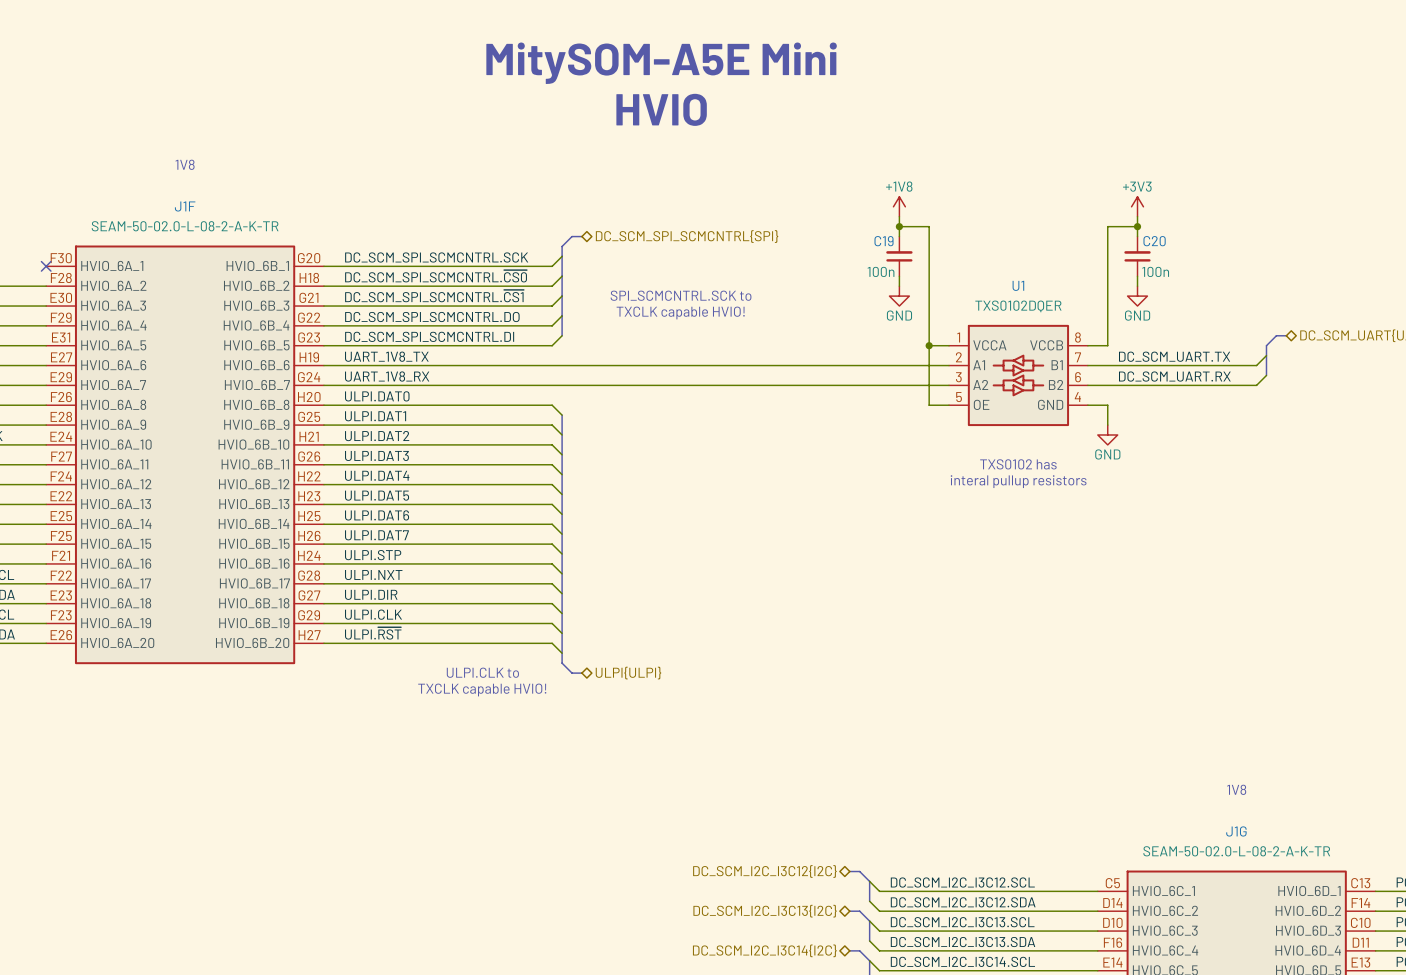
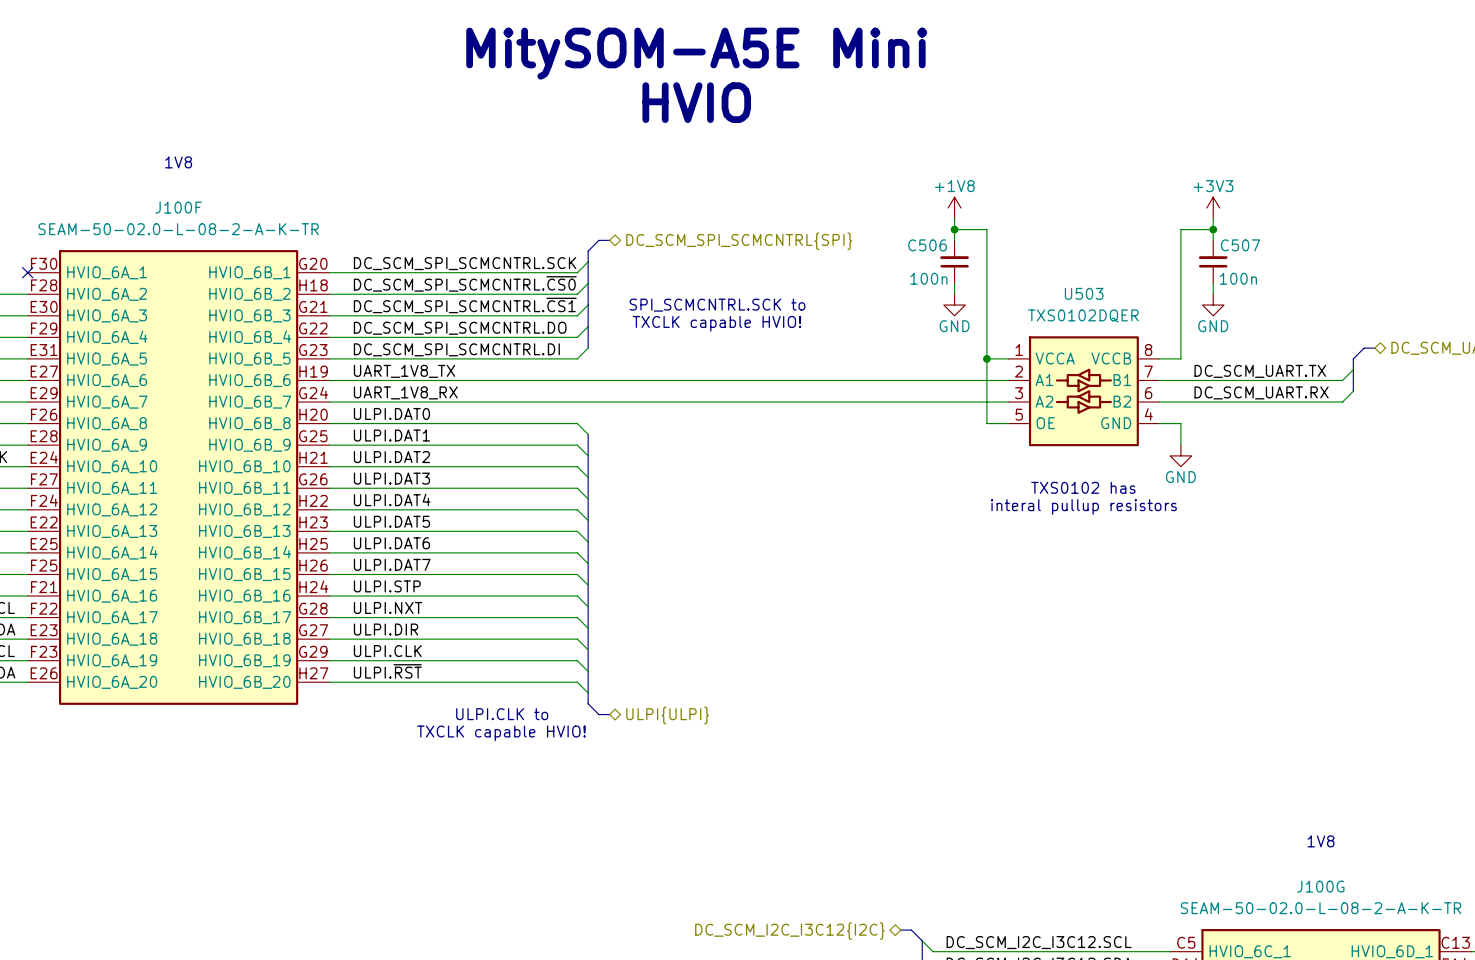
J1F name: J1F (185, 206) -> J100F (178, 207)
C19 name: C19 (884, 241) -> C506 (927, 245)
C20 name: C20 (1154, 241) -> C507 (1240, 245)
U1 name: U1 (1018, 285) -> U503 (1084, 293)
J1G name: J1G (1236, 831) -> J100G (1320, 886)

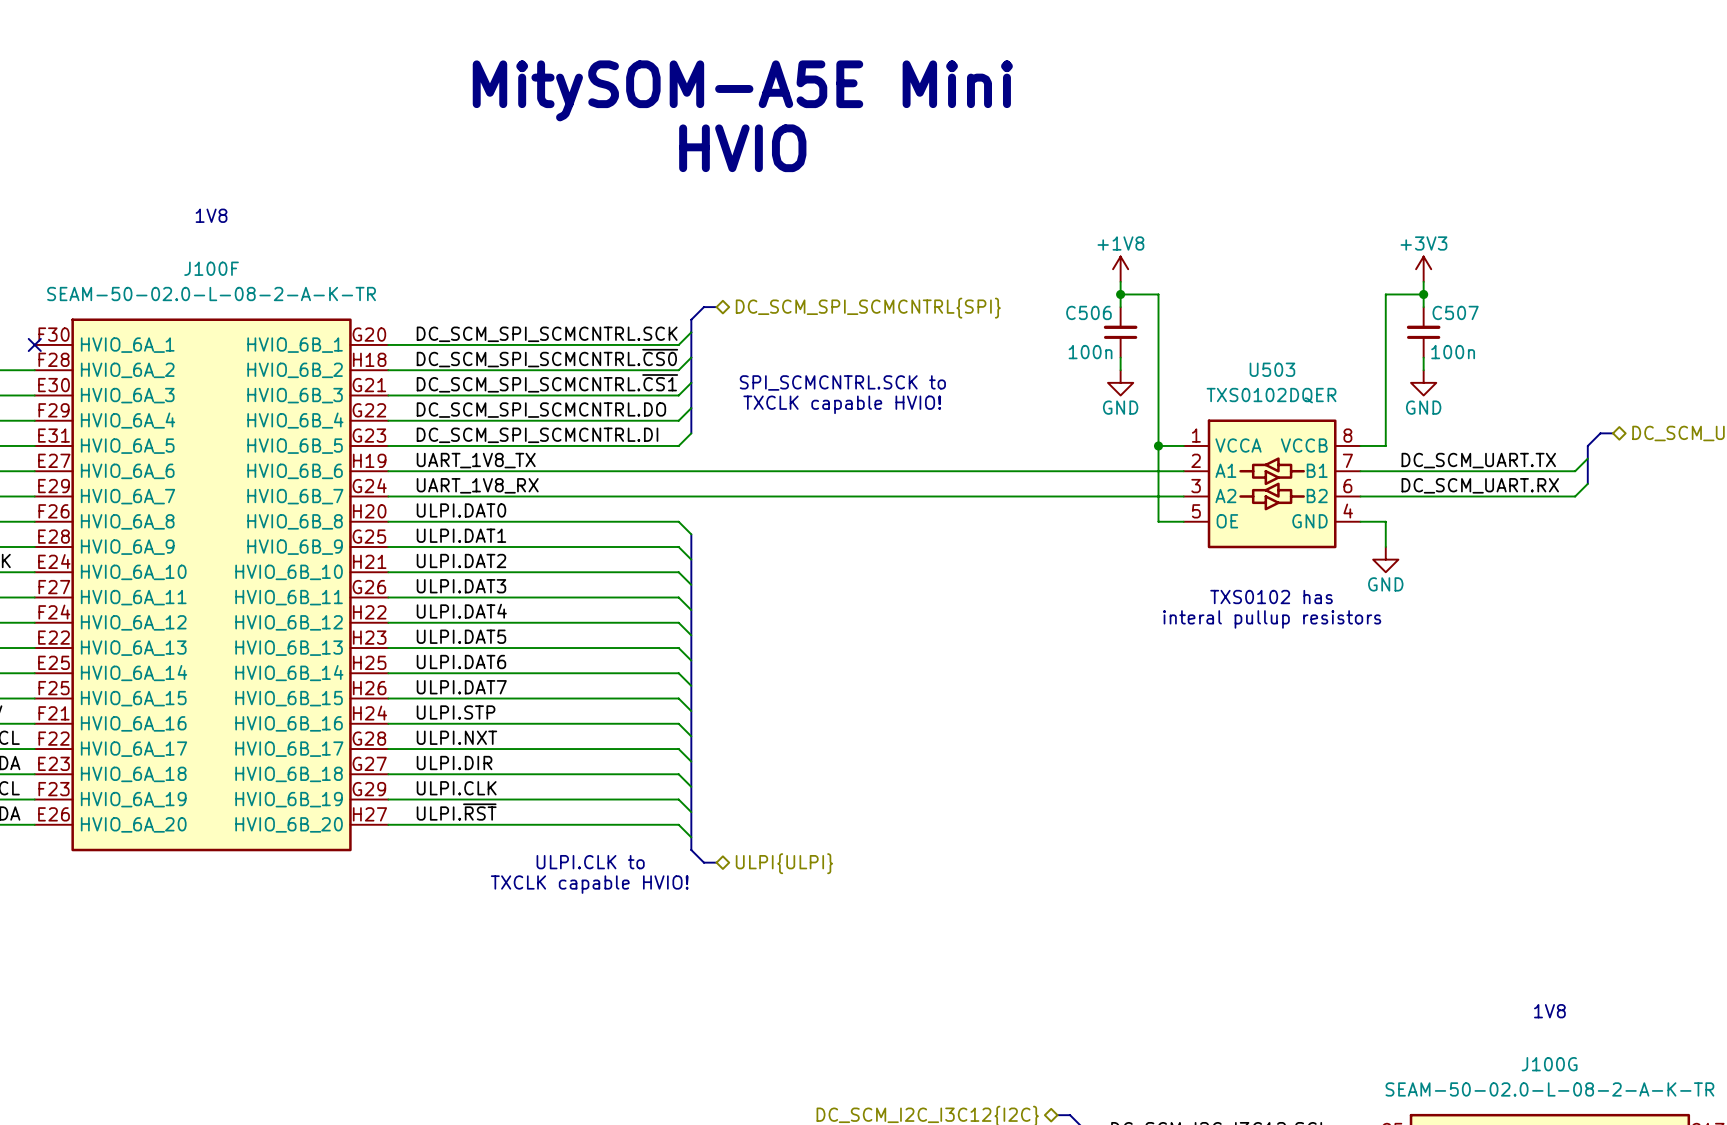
text position: MitySOM-A5E Mini (696, 53) -> MitySOM-A5E Mini (742, 90)
text position: HVIO (696, 102) -> HVIO (742, 148)

